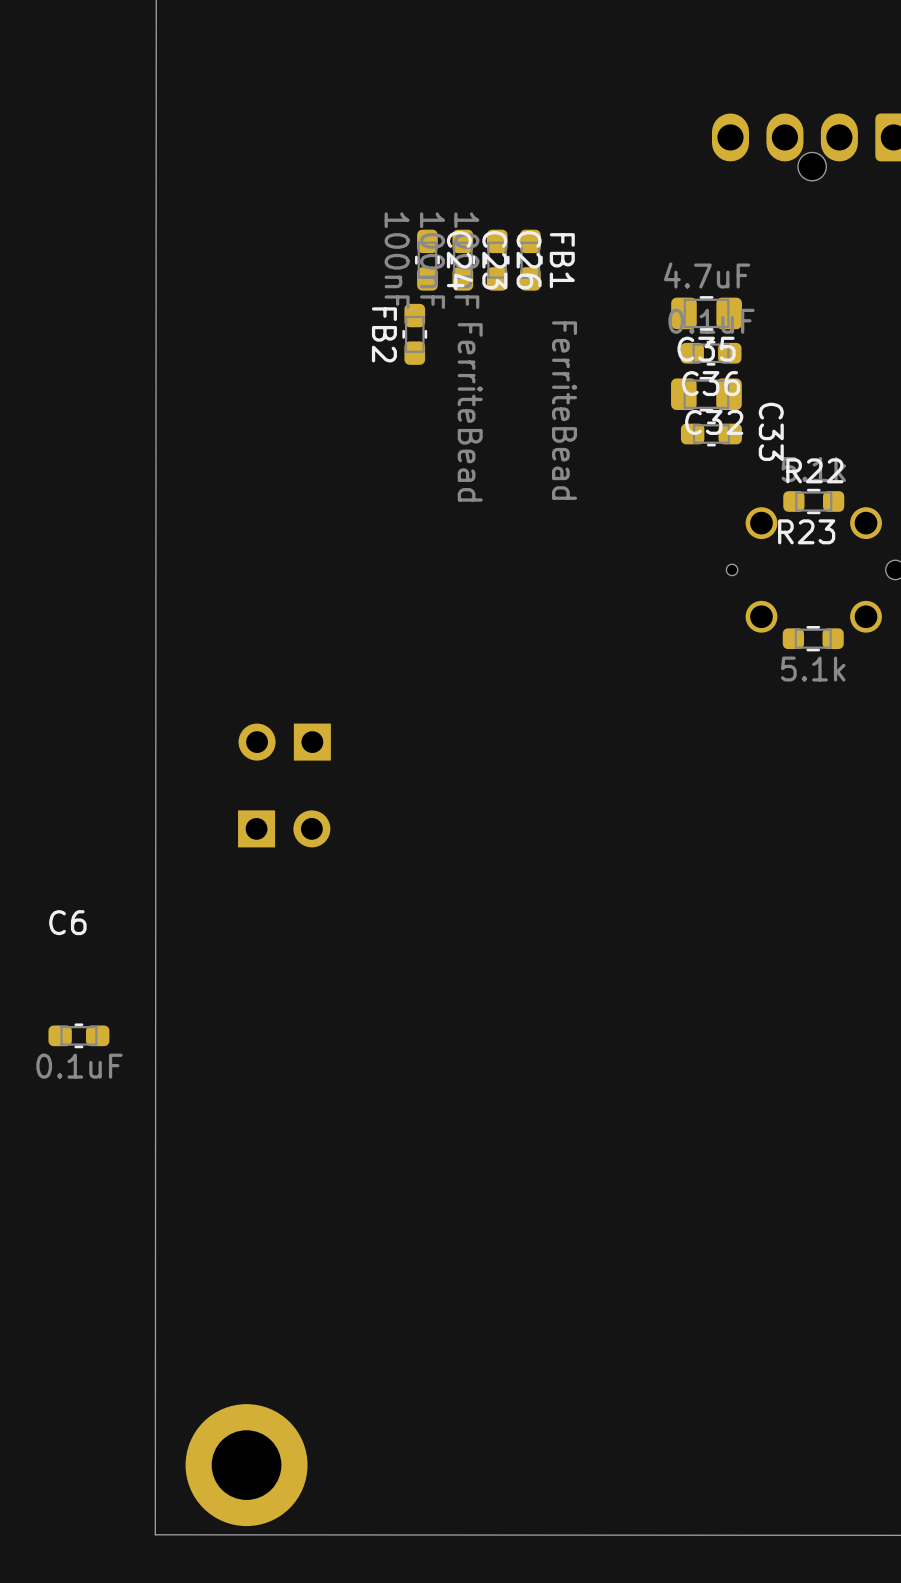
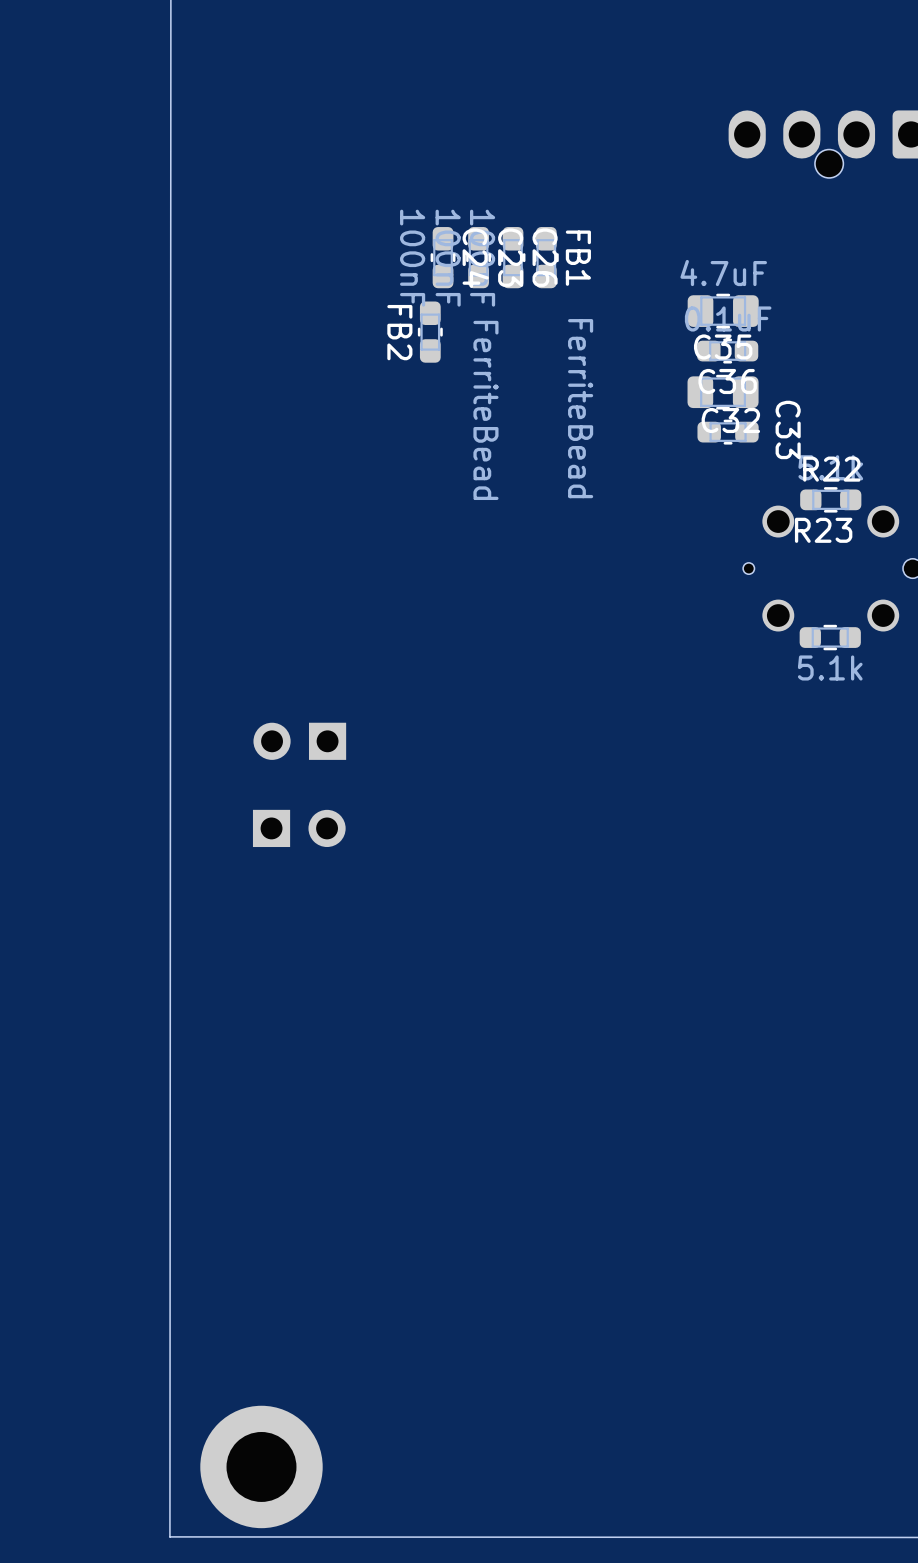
C6: 0.1uF (78, 1035) -> none

